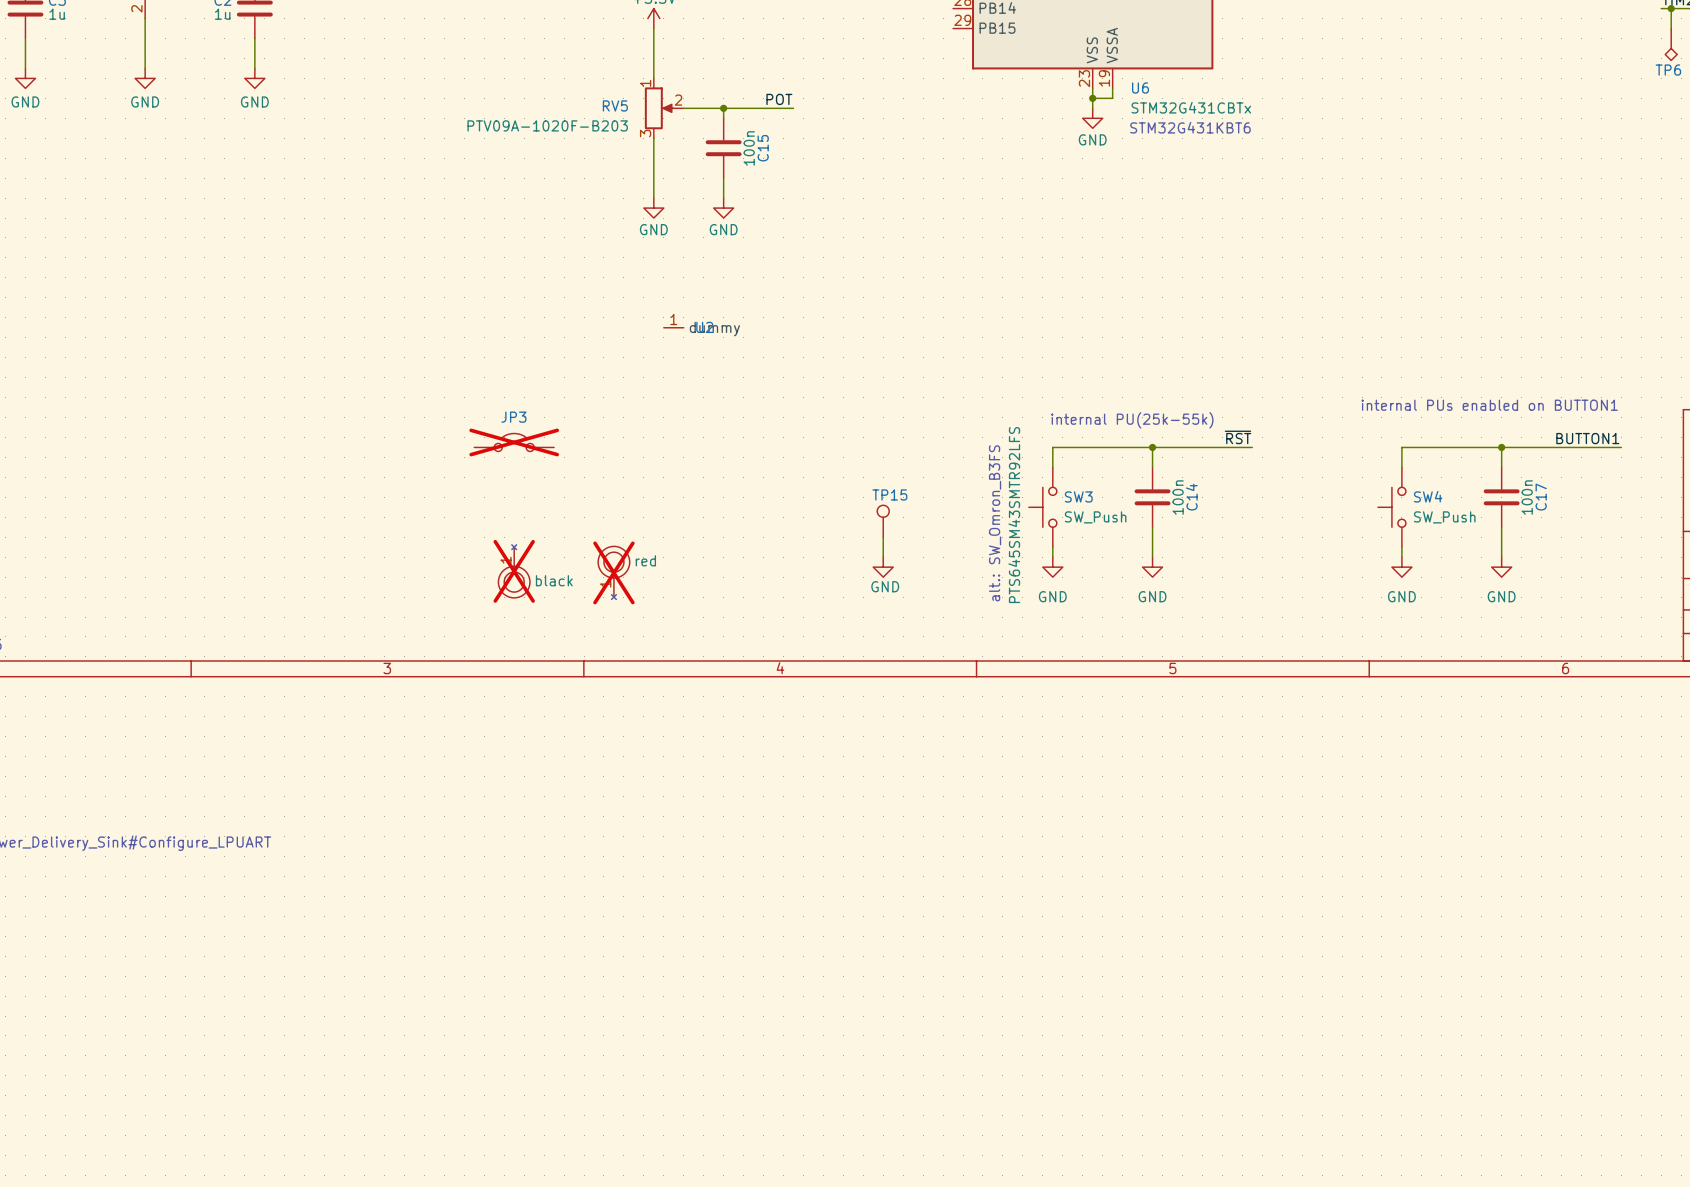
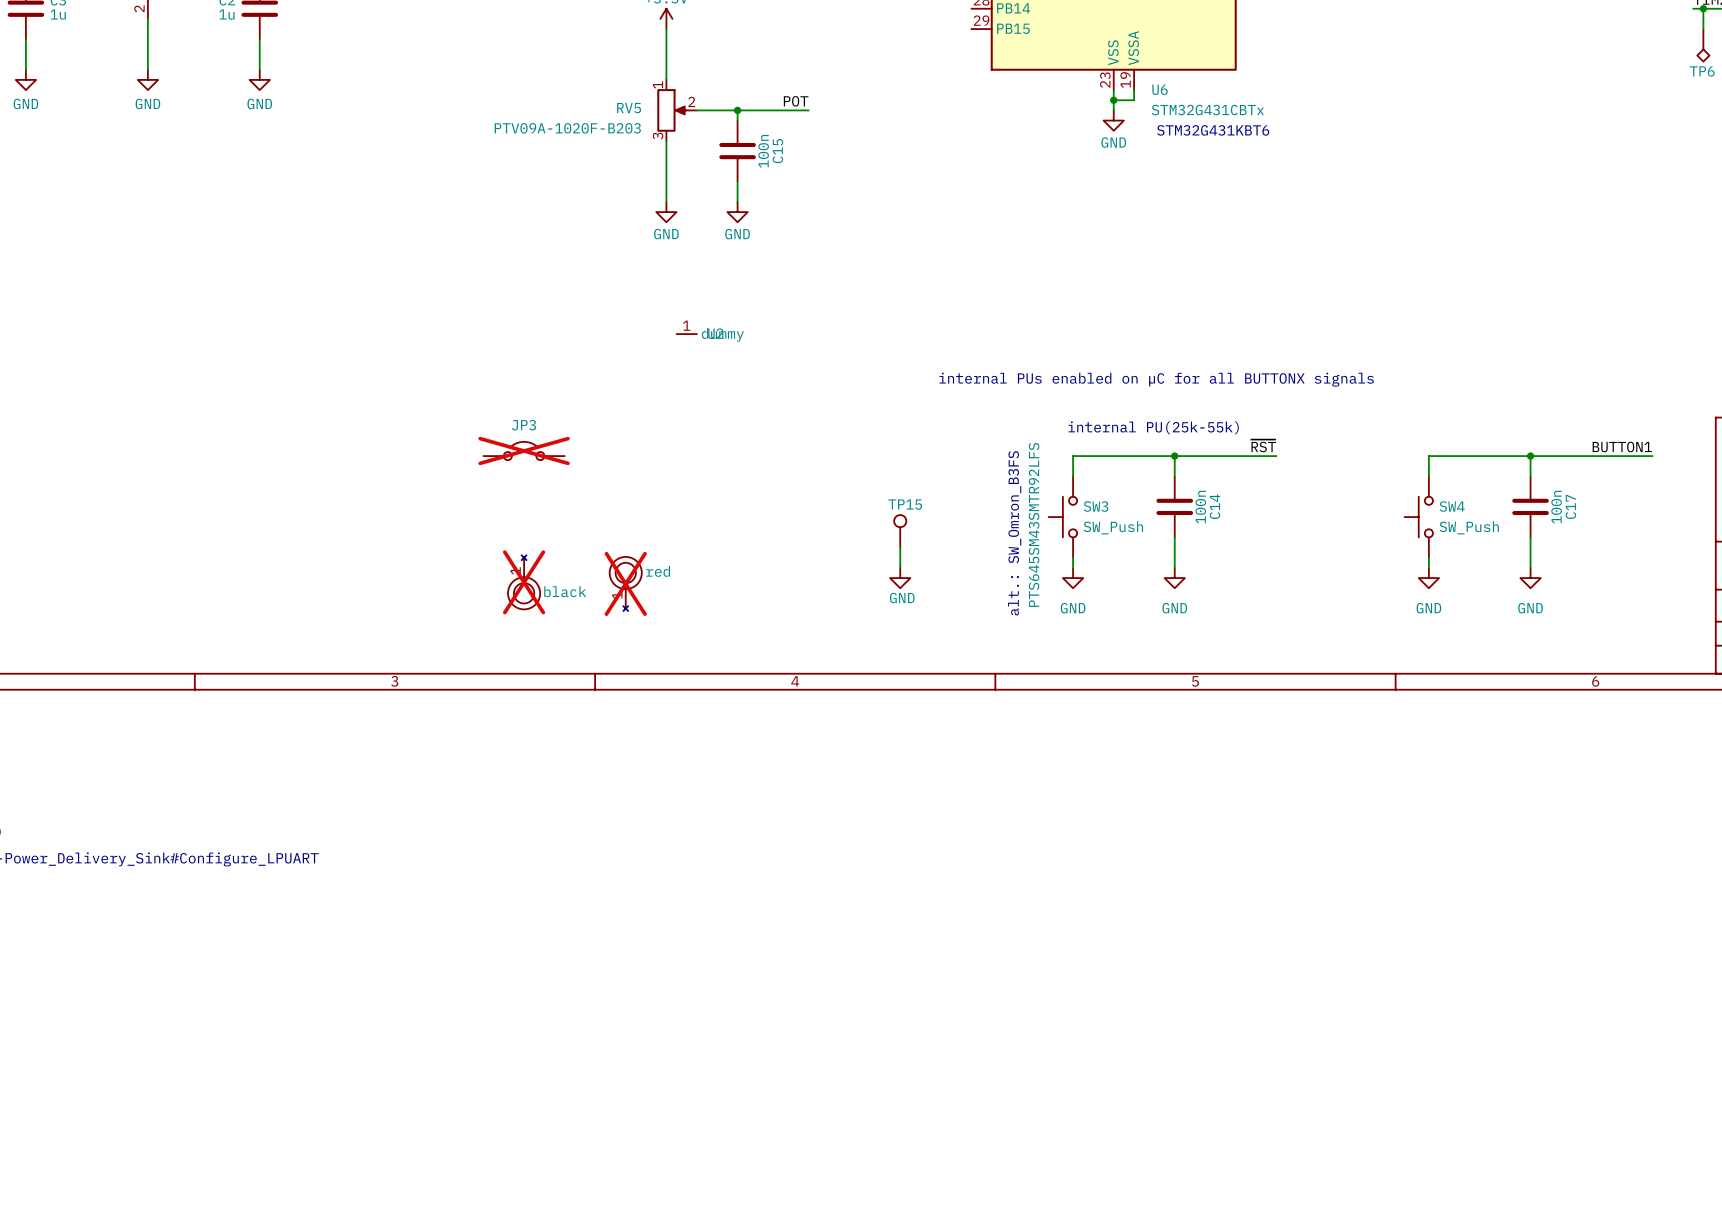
text: none -> internal PUs enabled on µC for all BUTTONX signals (1156, 379)
text: internal PUs enabled on BUTTON1 (1489, 405) -> none

